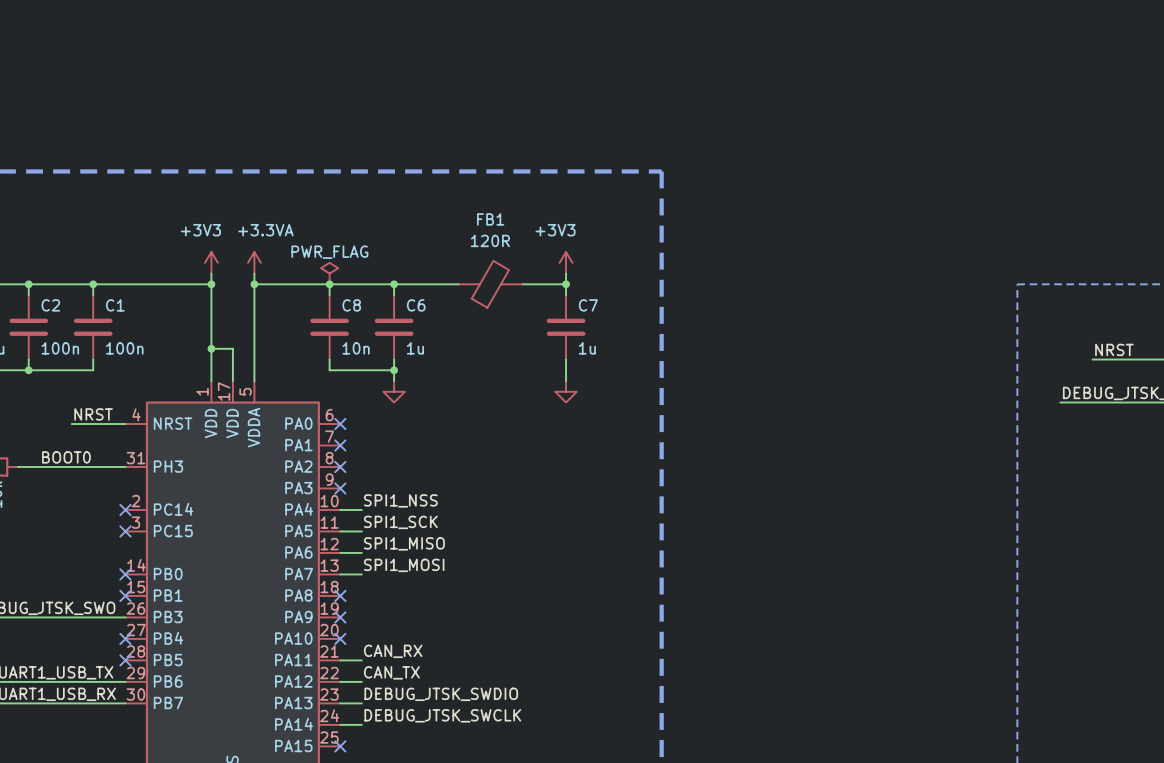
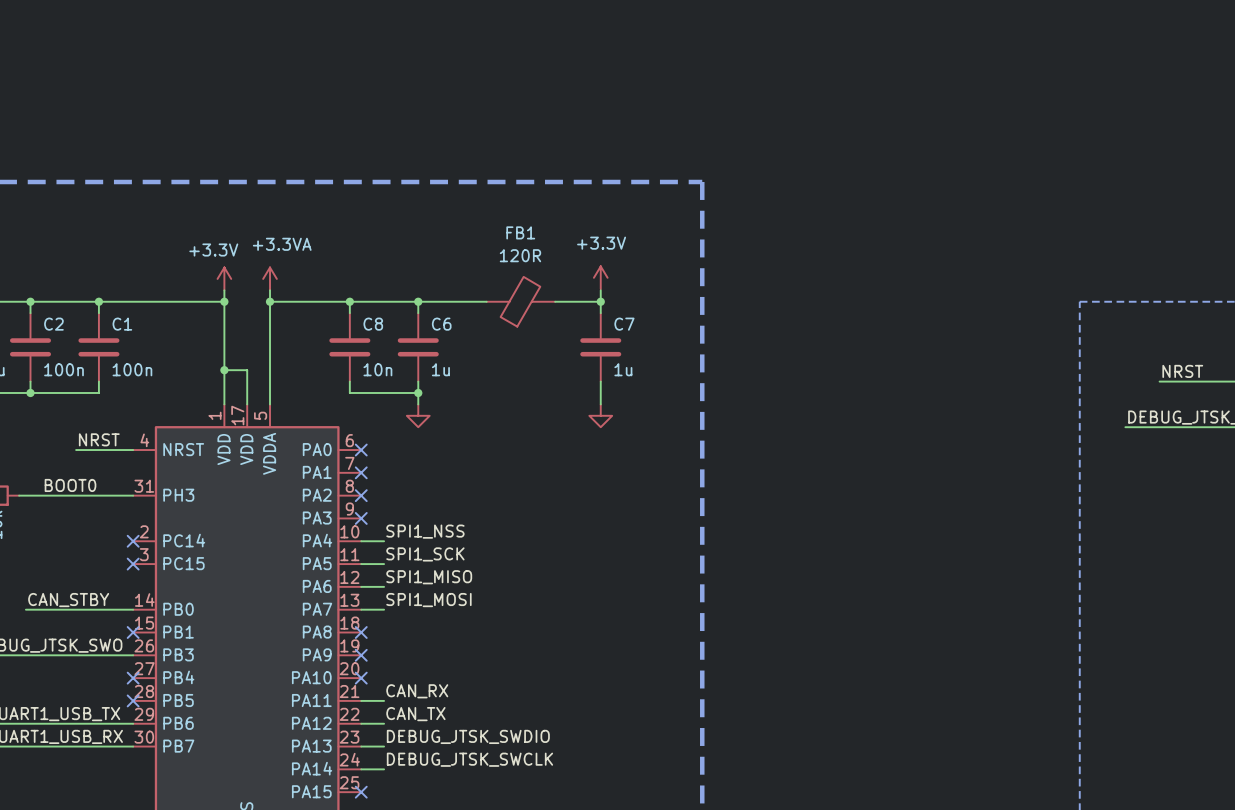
power symbol: +3V3 (211, 262) -> +3.3V (224, 278)
power symbol: +3V3 (566, 262) -> +3.3V (600, 277)
power symbol: PWR_FLAG (329, 273) -> none
label: none -> CAN_STBY (68, 600)
wire: none -> (25, 609) (133, 609)
no-connect mark: (125, 574) -> none

